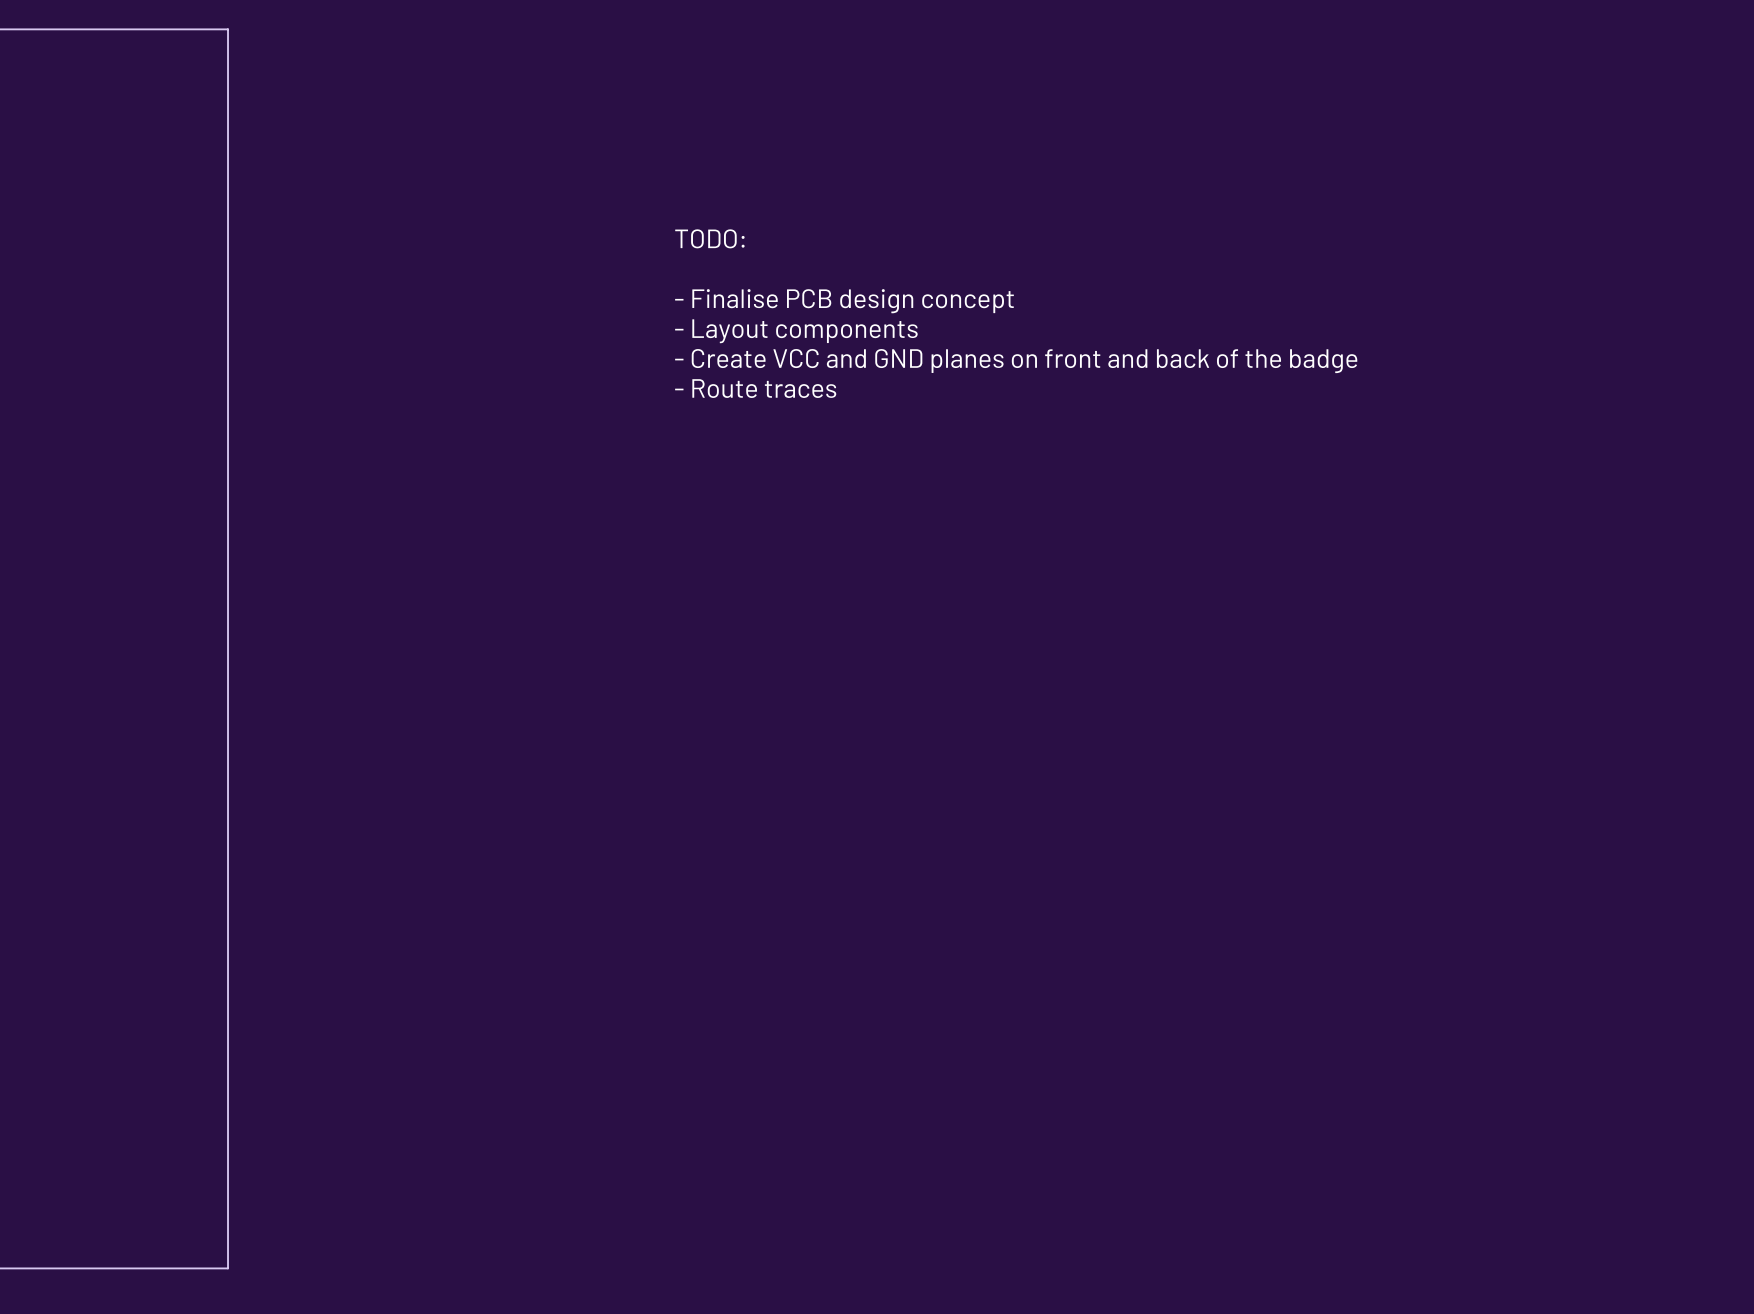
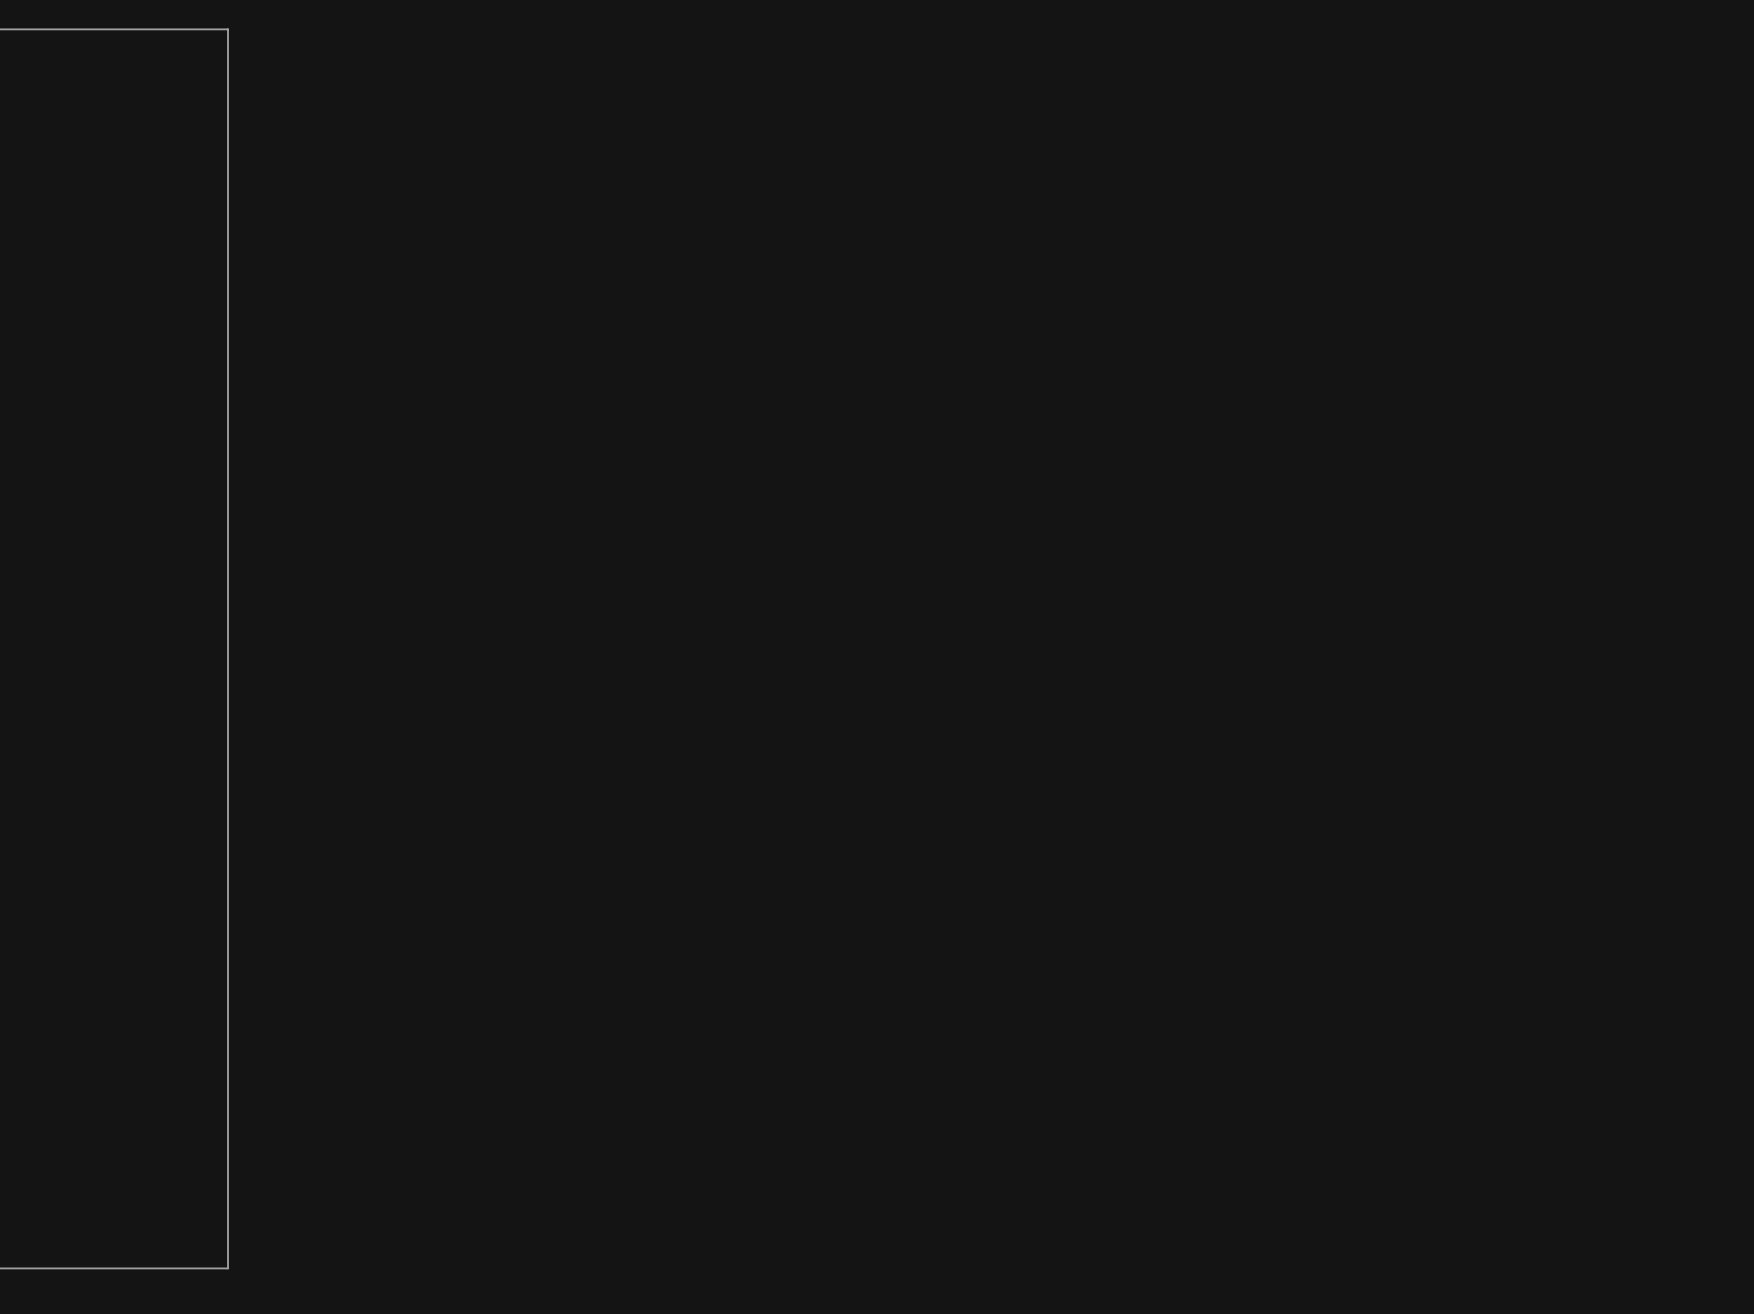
text: TODO: (709, 238) -> none
text: - Finalise PCB design concept (844, 301) -> none
text: - Layout components (796, 331) -> none
text: - Create VCC and GND planes on front and back of the badge (1016, 361) -> none
text: - Route traces (755, 388) -> none

